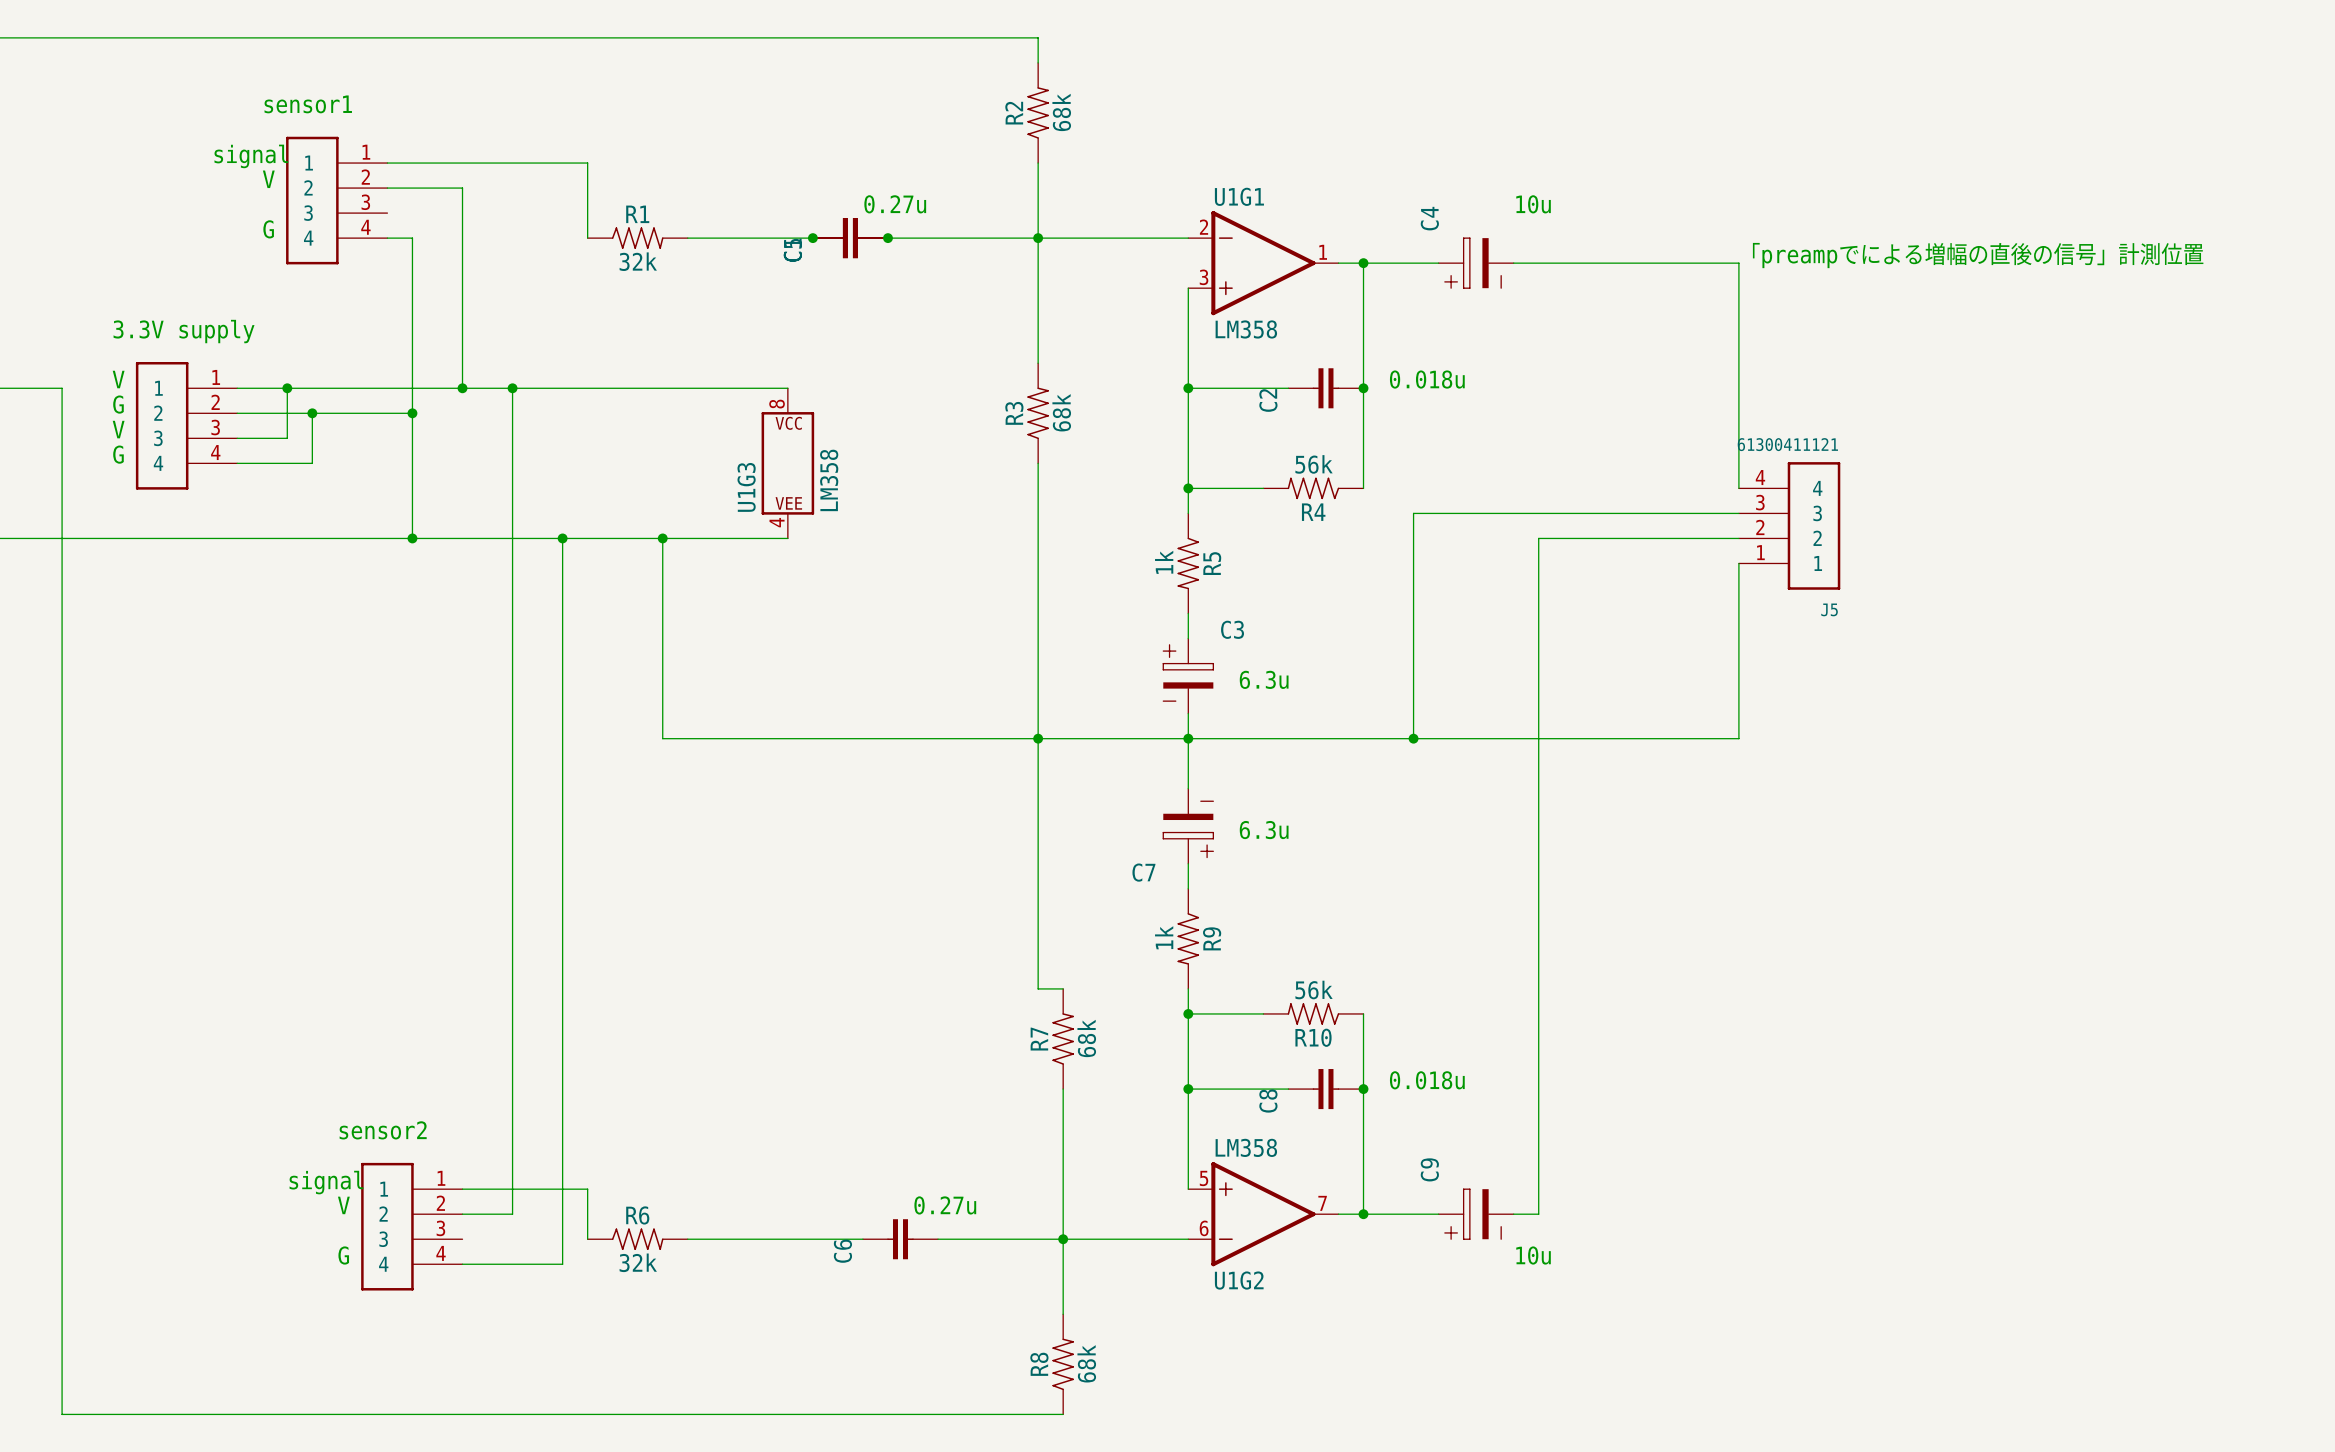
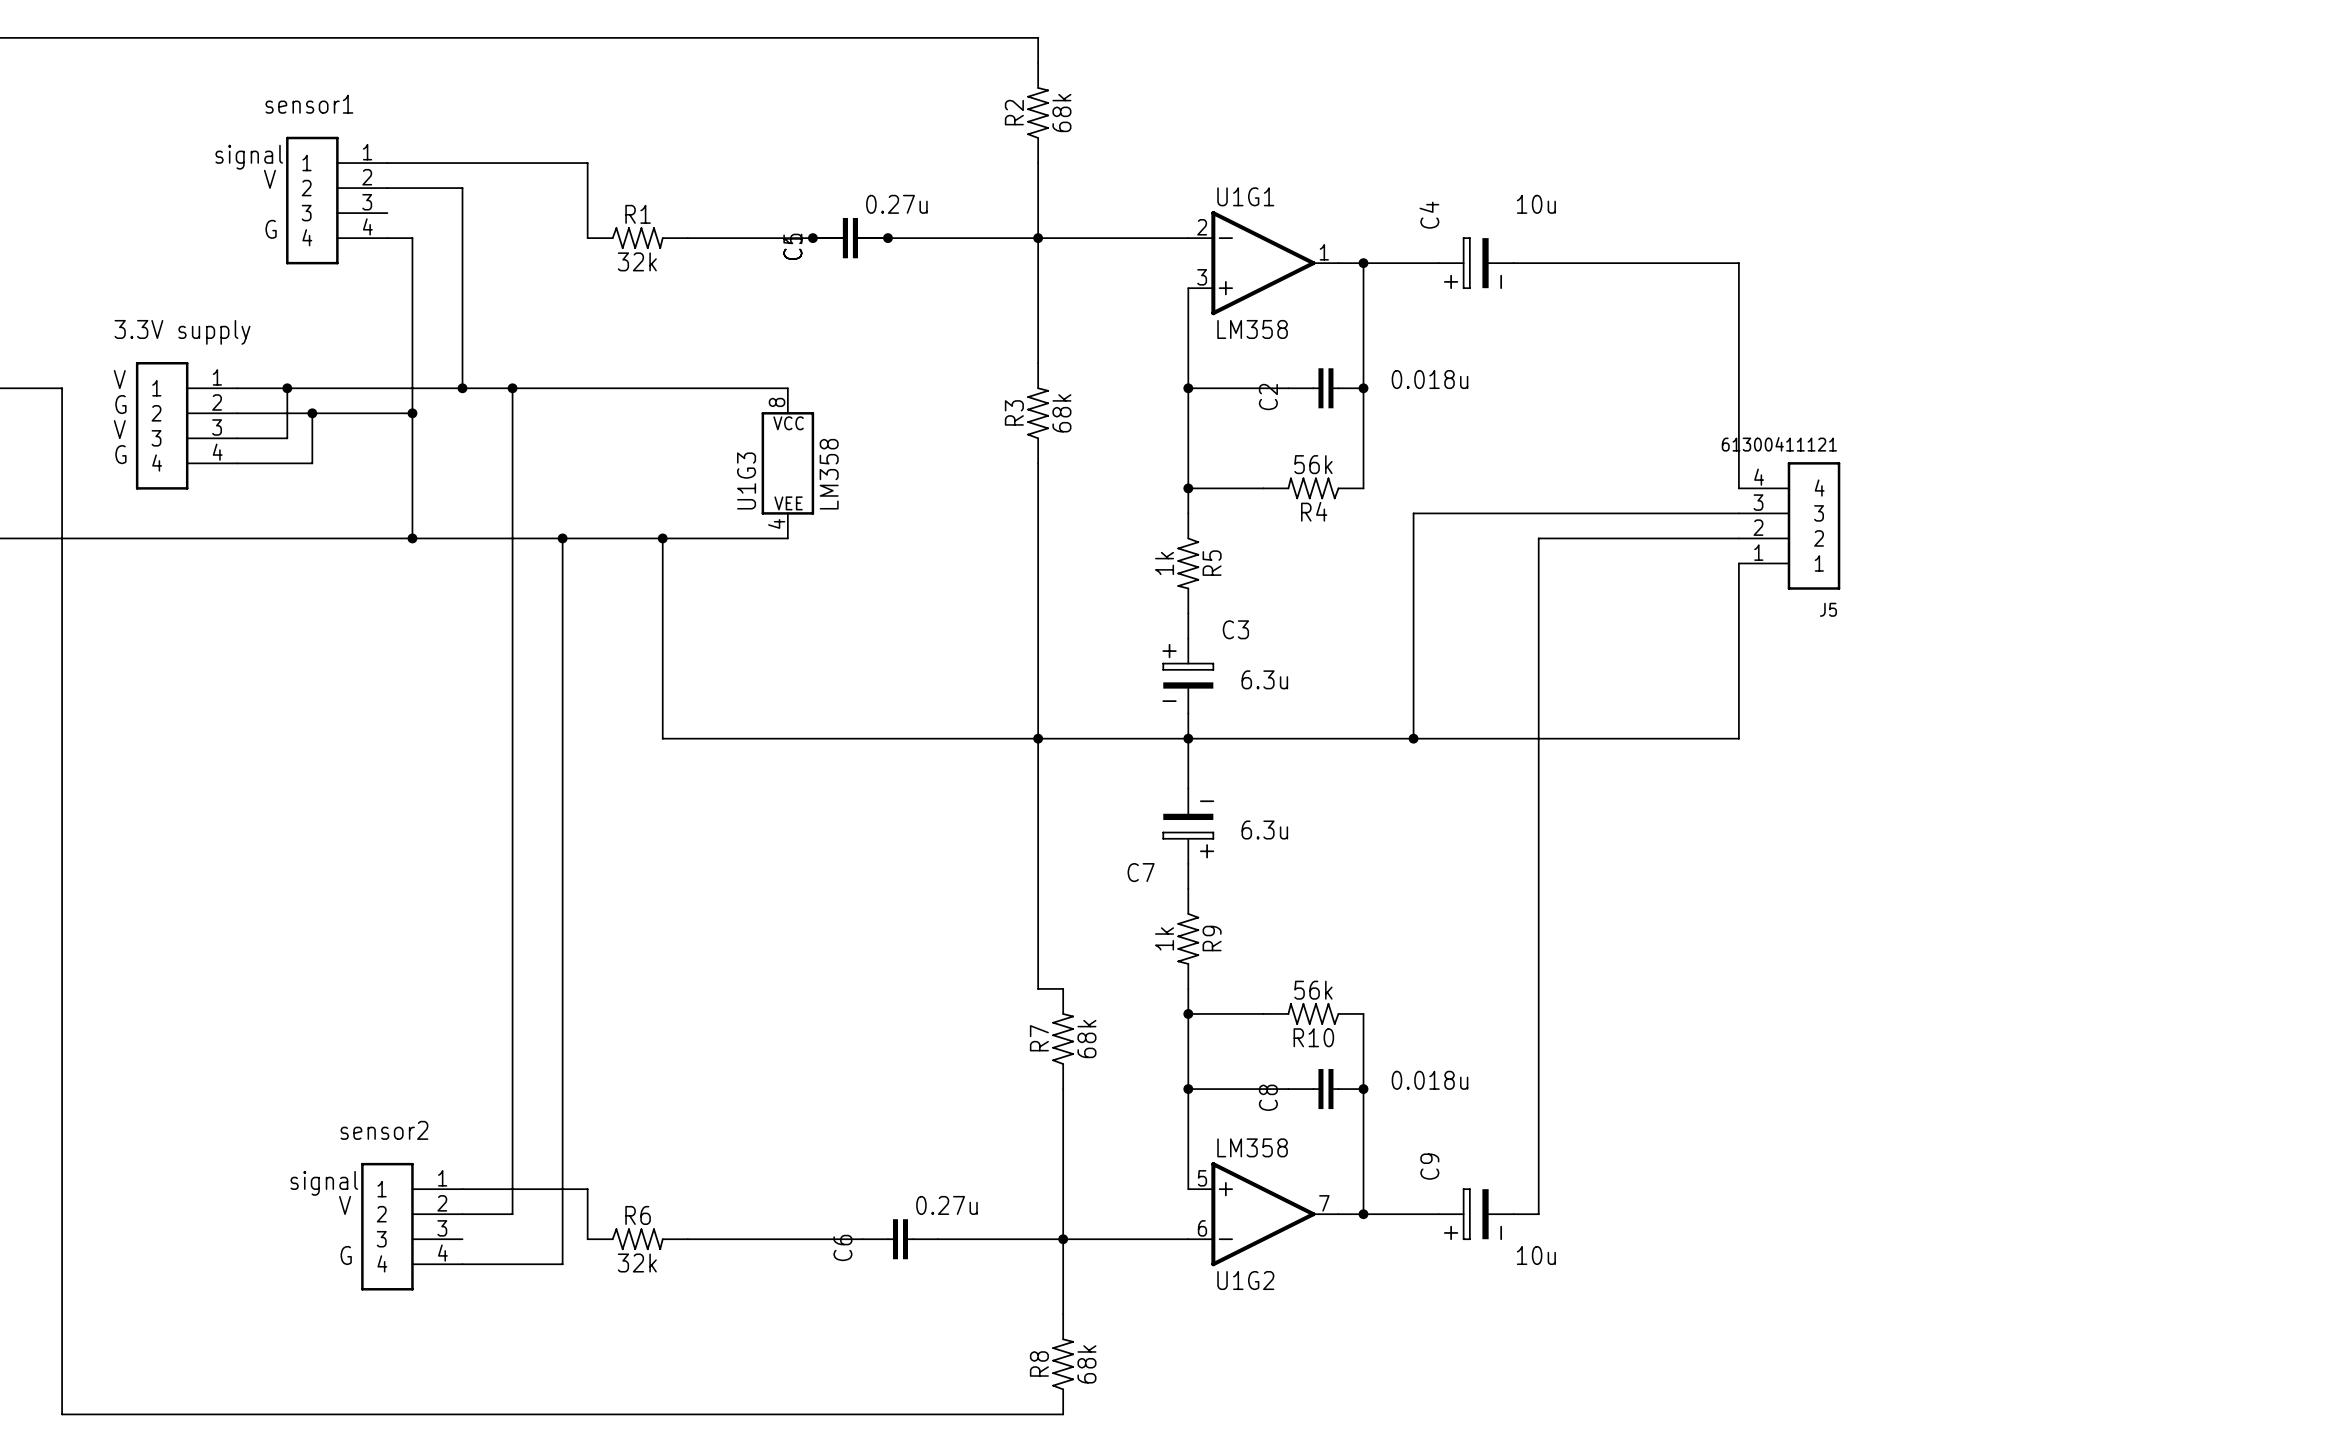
text: 「preampでによる増幅の直後の信号」計測位置 (1978, 255) -> none

